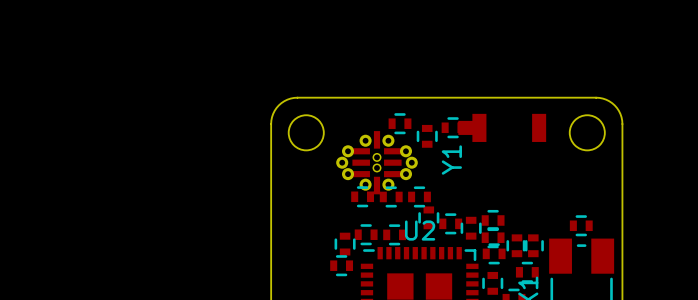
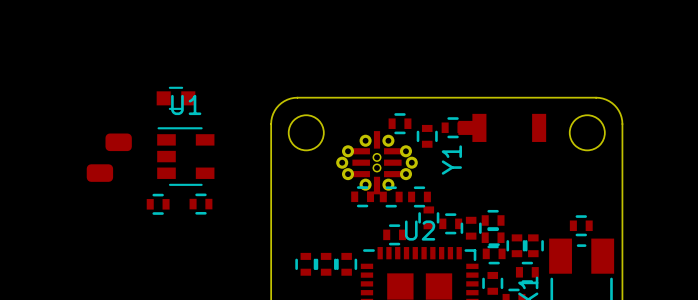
part: none -> (175, 98)
part: none -> (118, 142)
U1: none -> (185, 156)
part: none -> (99, 173)
part: none -> (158, 204)
part: none -> (200, 204)
part: (366, 234) -> none
part: (345, 244) -> none
part: none -> (305, 264)
part: none -> (326, 264)
part rotation: 0° (341, 265) -> 90° clockwise (346, 264)

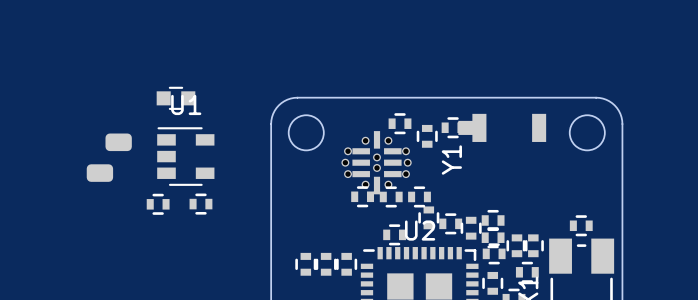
Y1 footprint: [336, 131, 418, 195] -> [341, 131, 412, 195]

